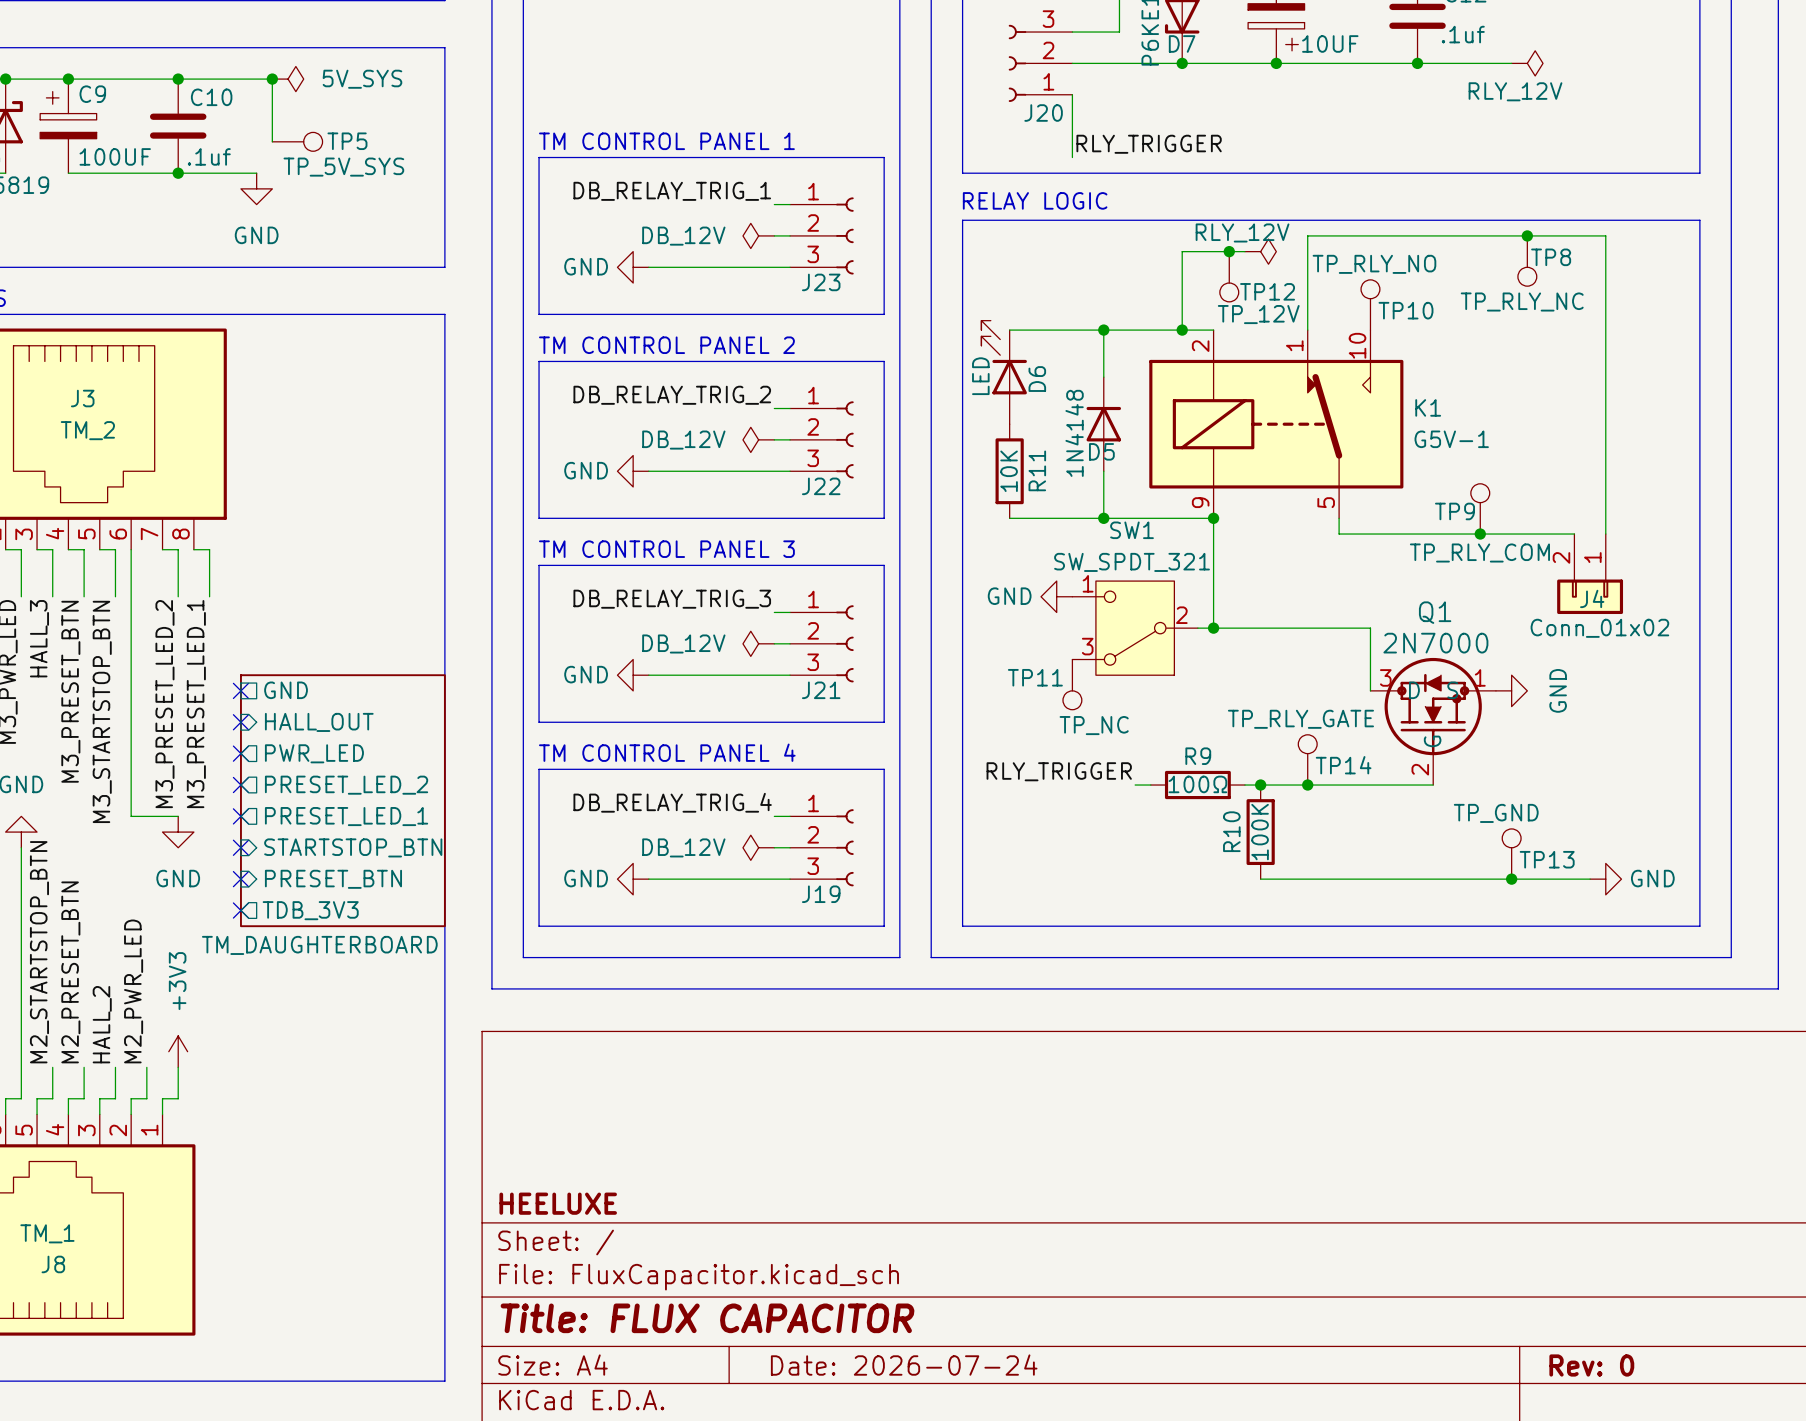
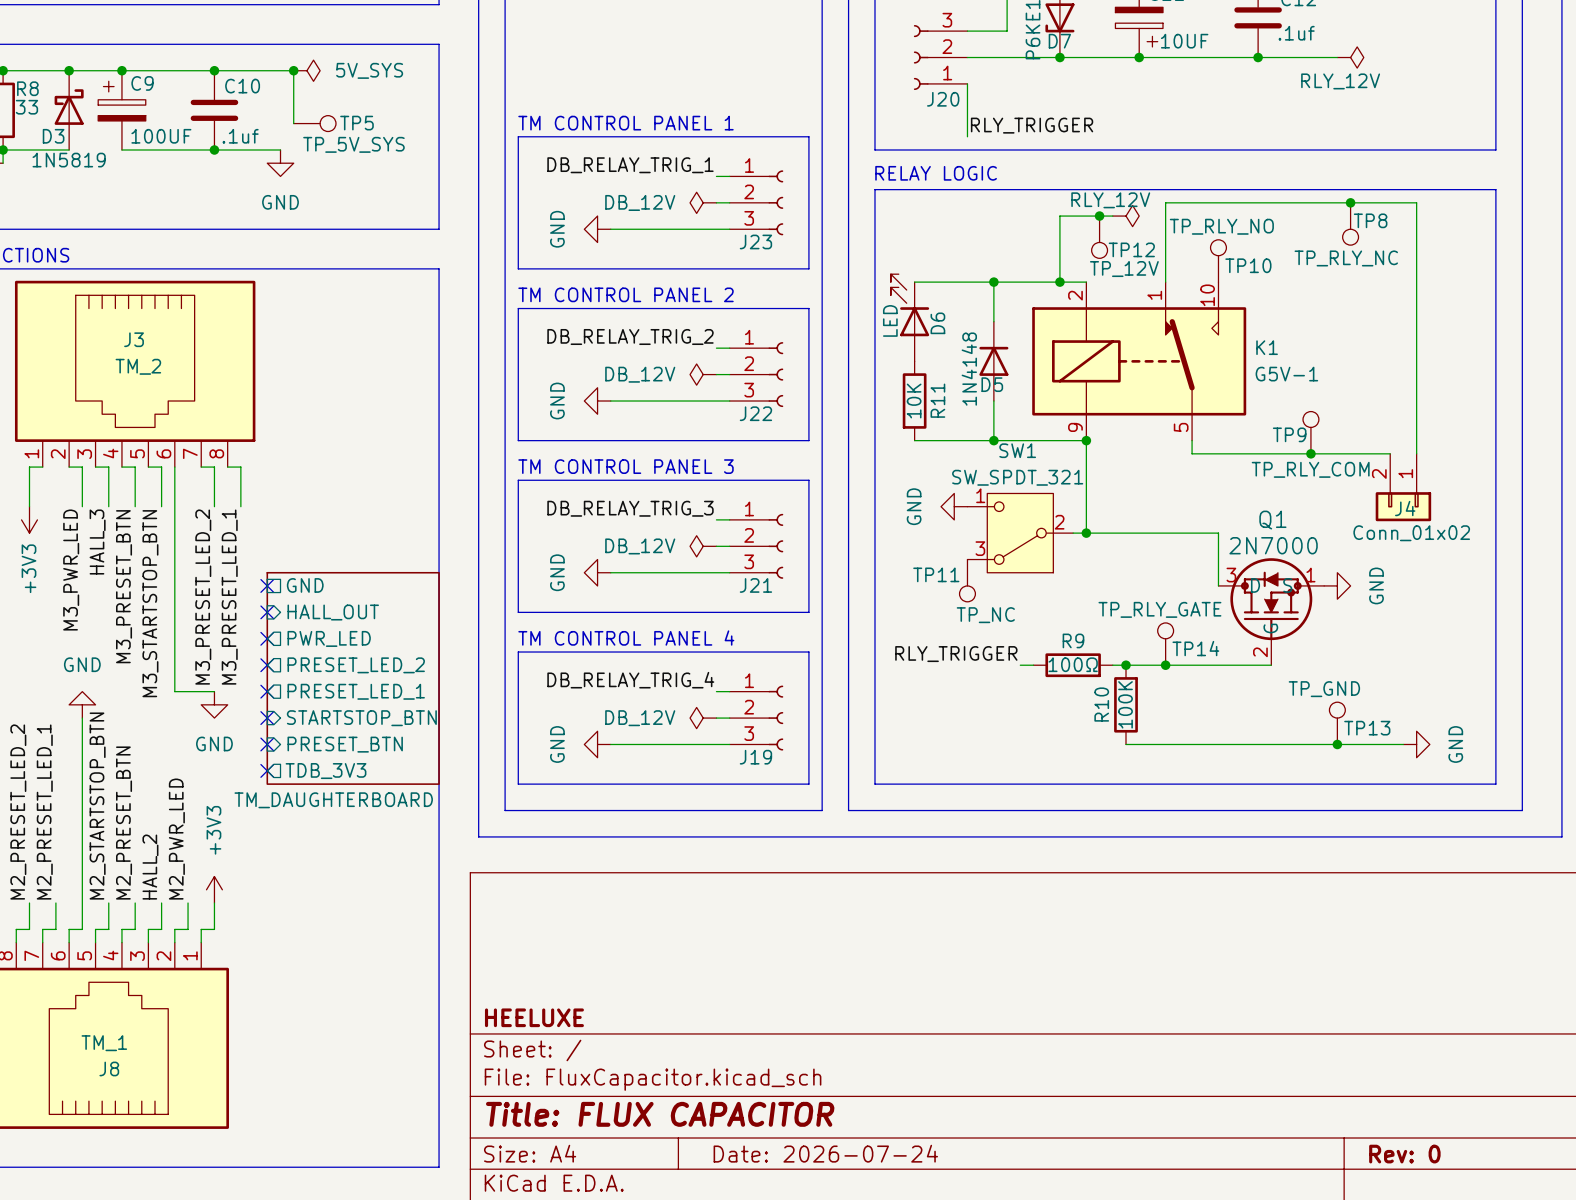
power symbol text rotation: 0° (586, 266) -> 90° counterclockwise (557, 229)
power symbol text rotation: 0° (586, 470) -> 90° counterclockwise (557, 401)
power symbol text rotation: 0° (1009, 596) -> 90° counterclockwise (914, 506)
power symbol text rotation: 0° (586, 674) -> 90° counterclockwise (557, 572)
power symbol text rotation: 0° (586, 878) -> 90° counterclockwise (557, 744)
power symbol text rotation: 0° (1652, 878) -> 90° counterclockwise (1455, 744)

